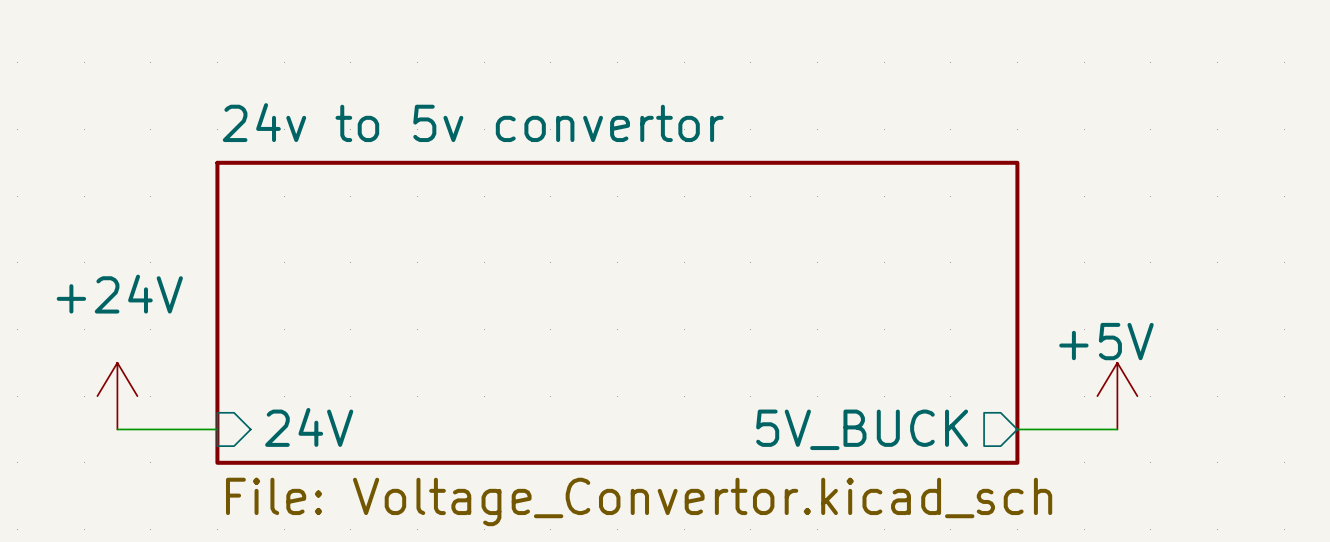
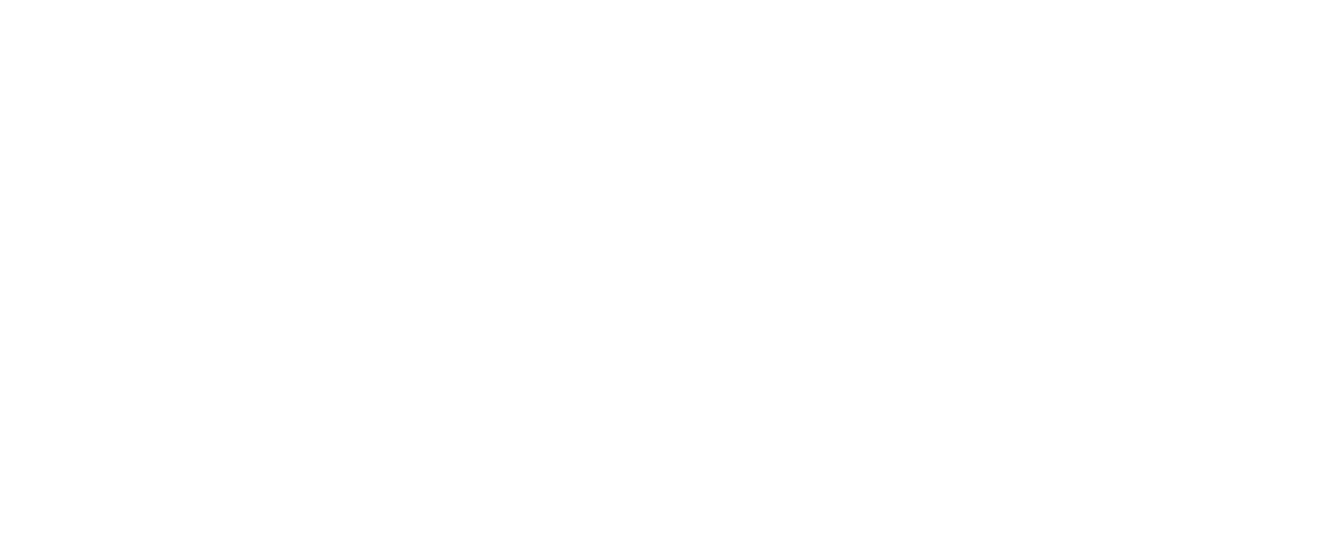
sheet 24v to 5v convertor: File: Voltage_Convertor.kicad_sch (617, 312) -> none
power symbol: +24V (117, 396) -> none
power symbol: +5V (1117, 396) -> none
sheet pin: 24V (309, 427) -> none
wire: (117, 429) (217, 429) -> none
sheet pin: 5V_BUCK (862, 429) -> none
wire: (1017, 429) (1117, 429) -> none

